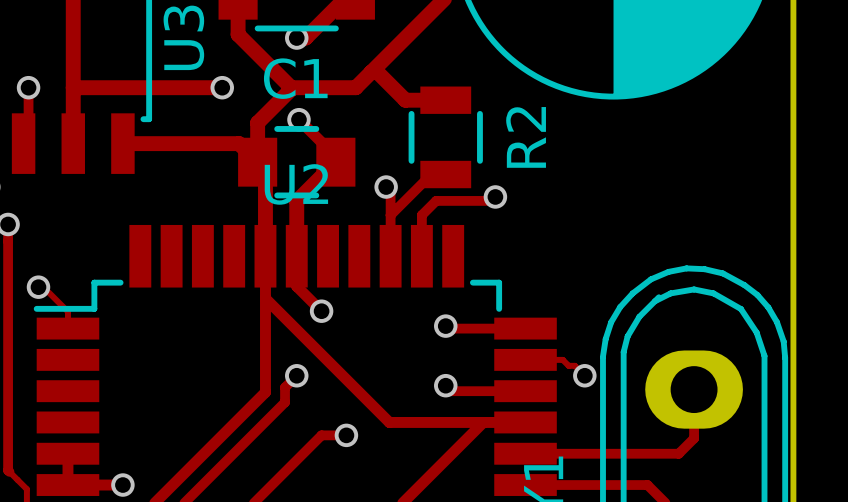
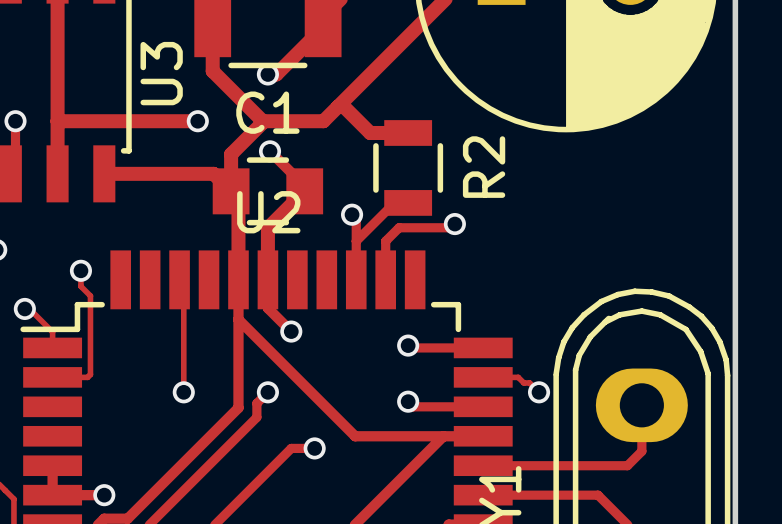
track: none -> (80, 270) (80, 286) (90, 295) (90, 374) (87, 377) (52, 377)
via: none -> (80, 270)
track: none -> (179, 279) (183, 284) (183, 392)
via: none -> (183, 392)

